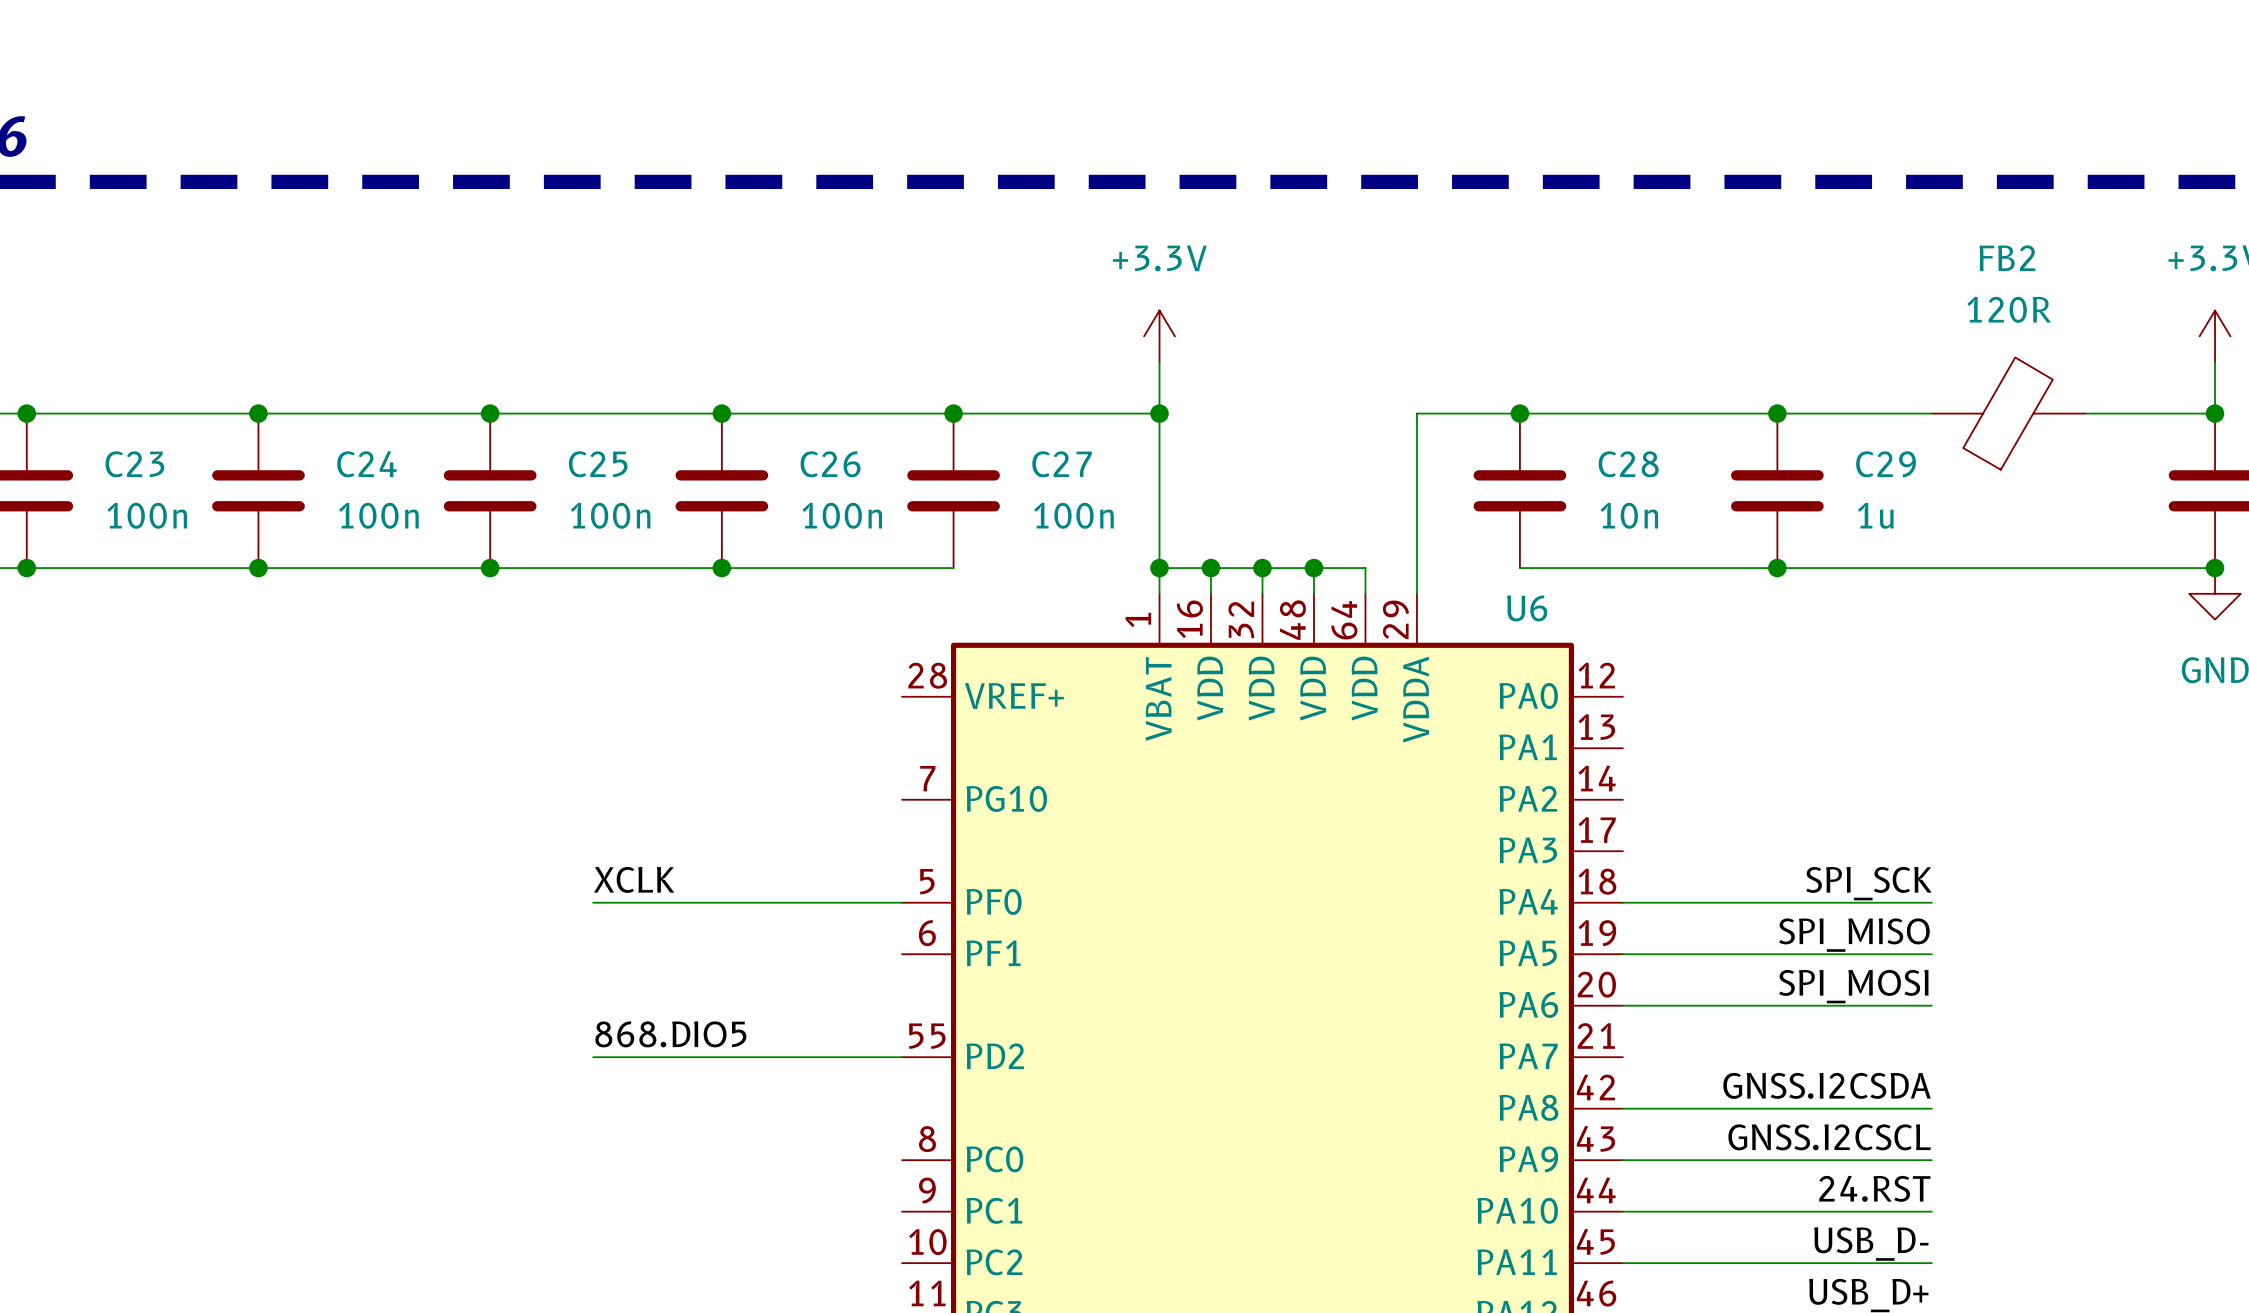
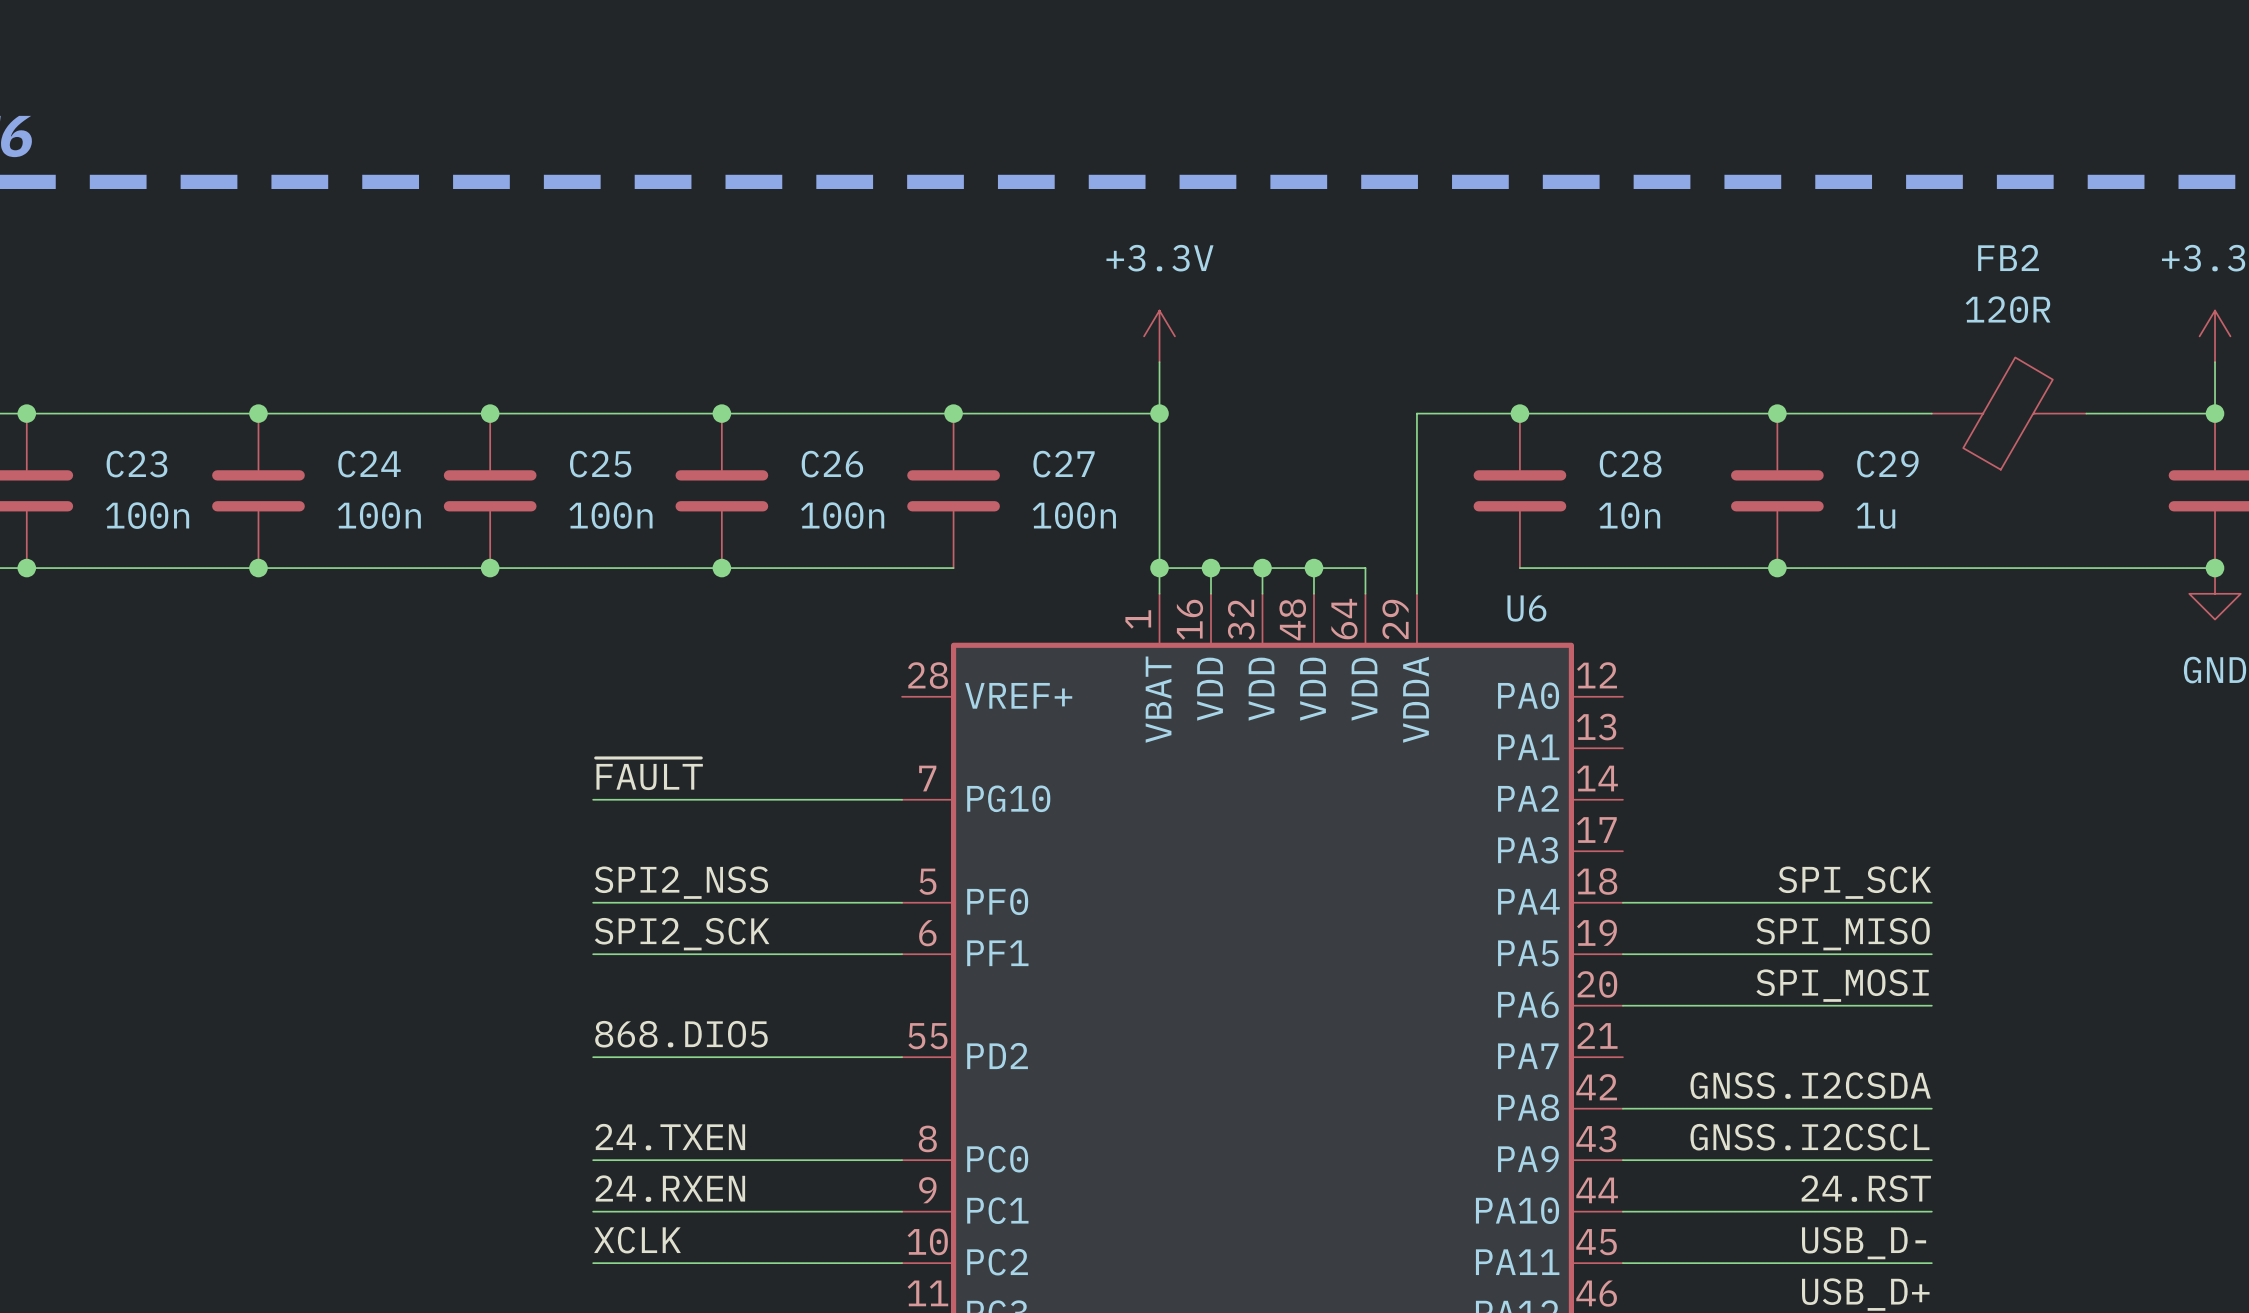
label: none -> ~{FAULT} (649, 774)
wire: none -> (593, 799) (902, 799)
label: XCLK (634, 879) -> SPI2_NSS (681, 882)
label: none -> SPI2_SCK (682, 934)
wire: none -> (593, 954) (902, 954)
label: none -> 24.TXEN (670, 1137)
wire: none -> (593, 1160) (902, 1160)
label: none -> 24.RXEN (670, 1188)
wire: none -> (593, 1211) (902, 1211)
label: none -> XCLK (637, 1240)
wire: none -> (593, 1263) (902, 1263)

